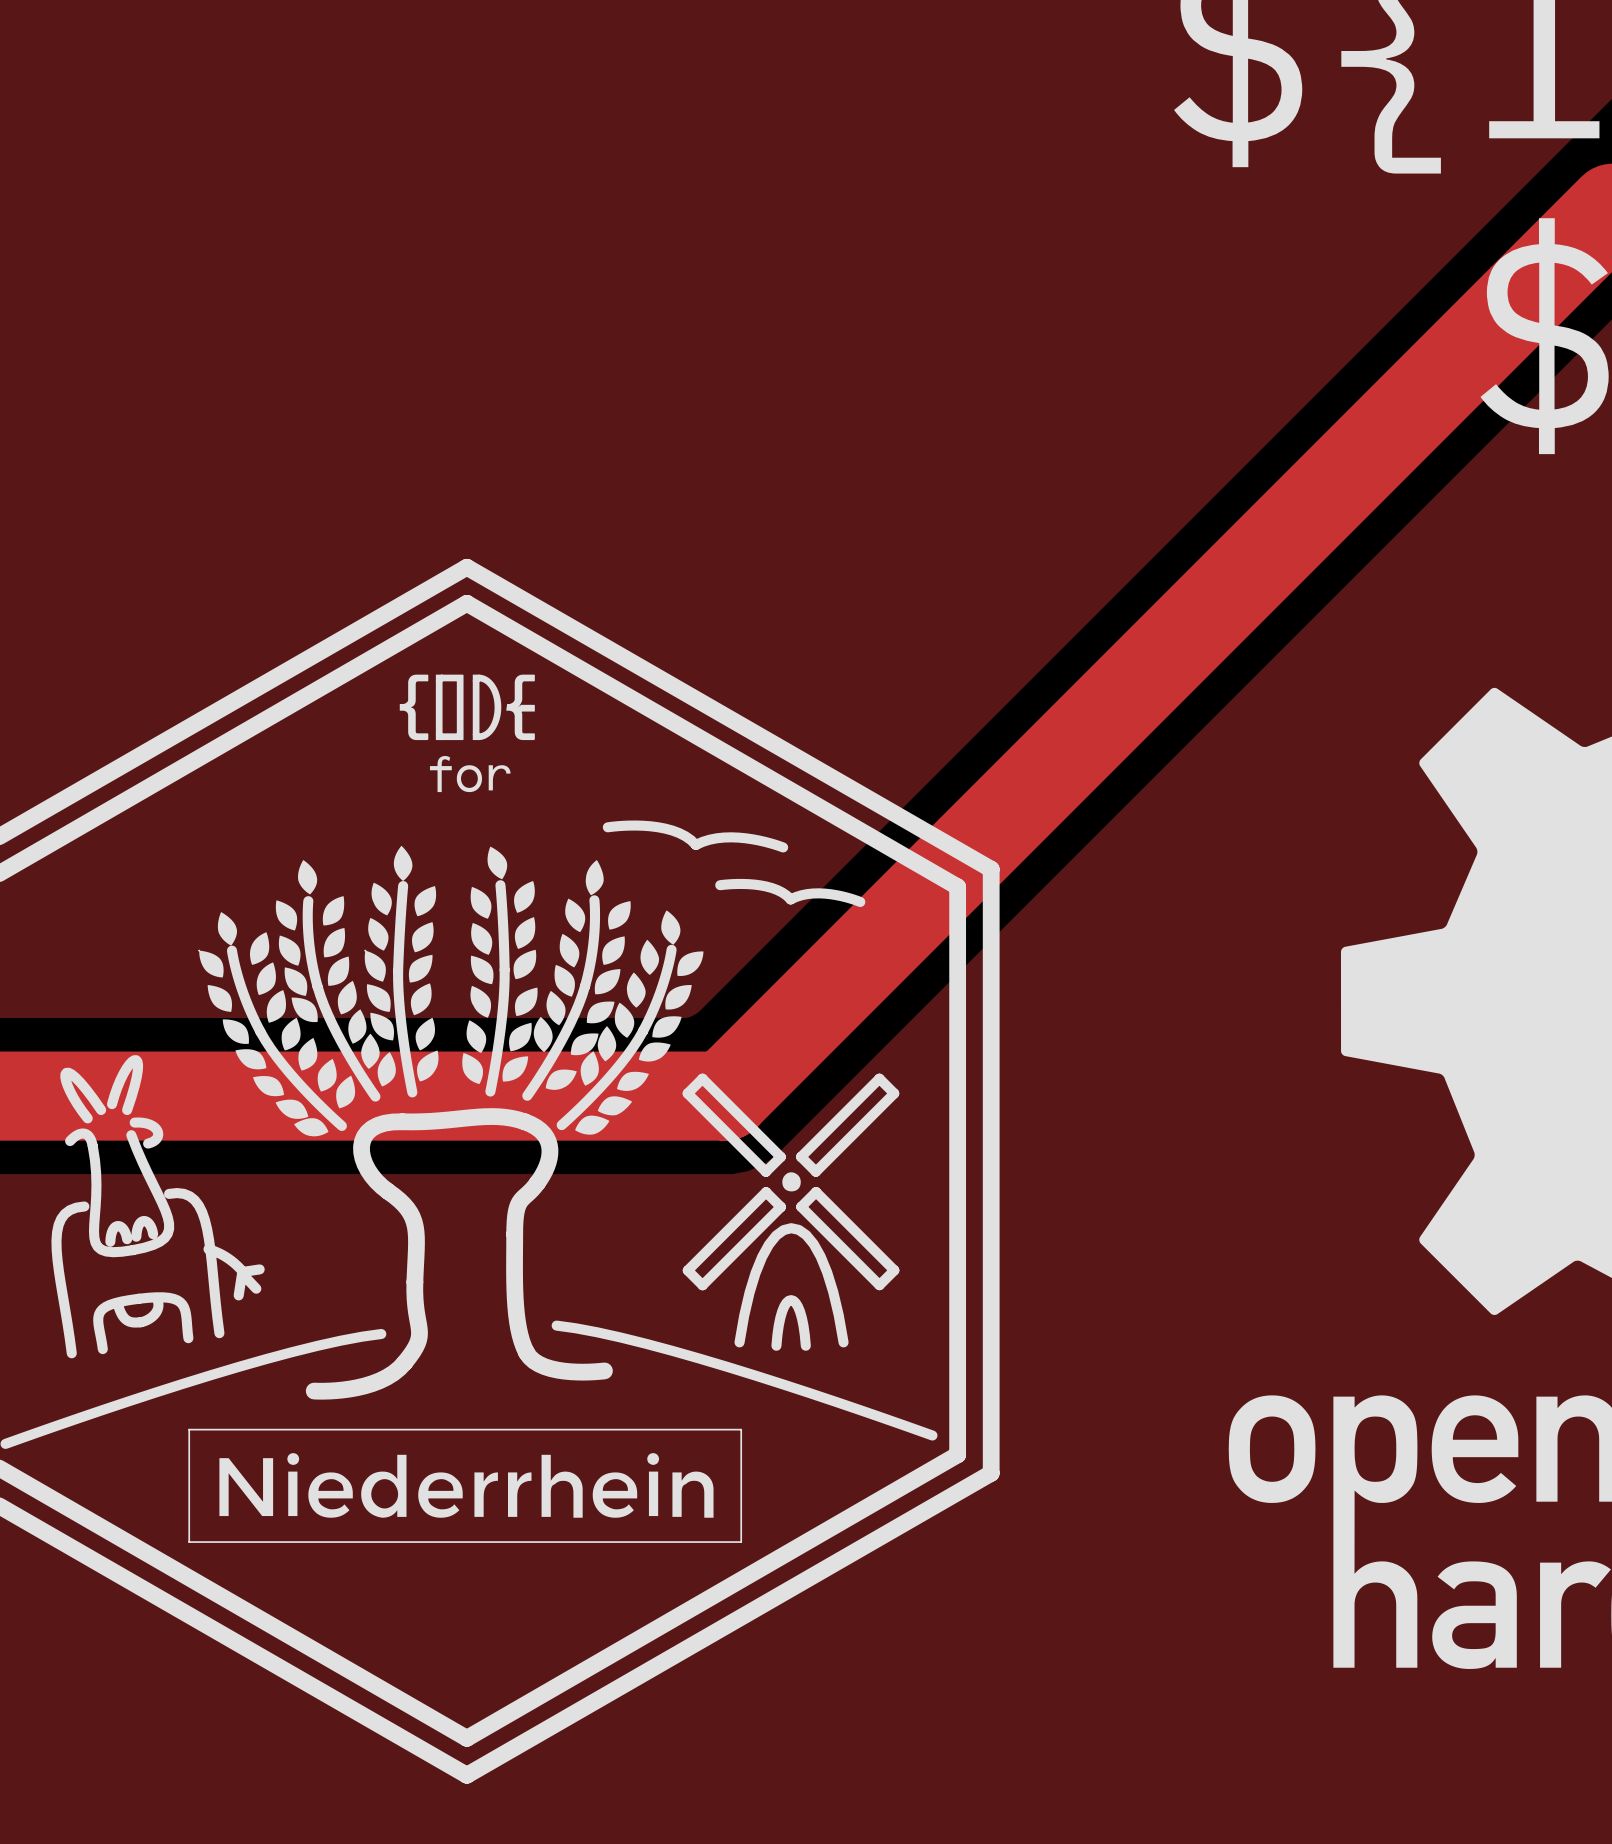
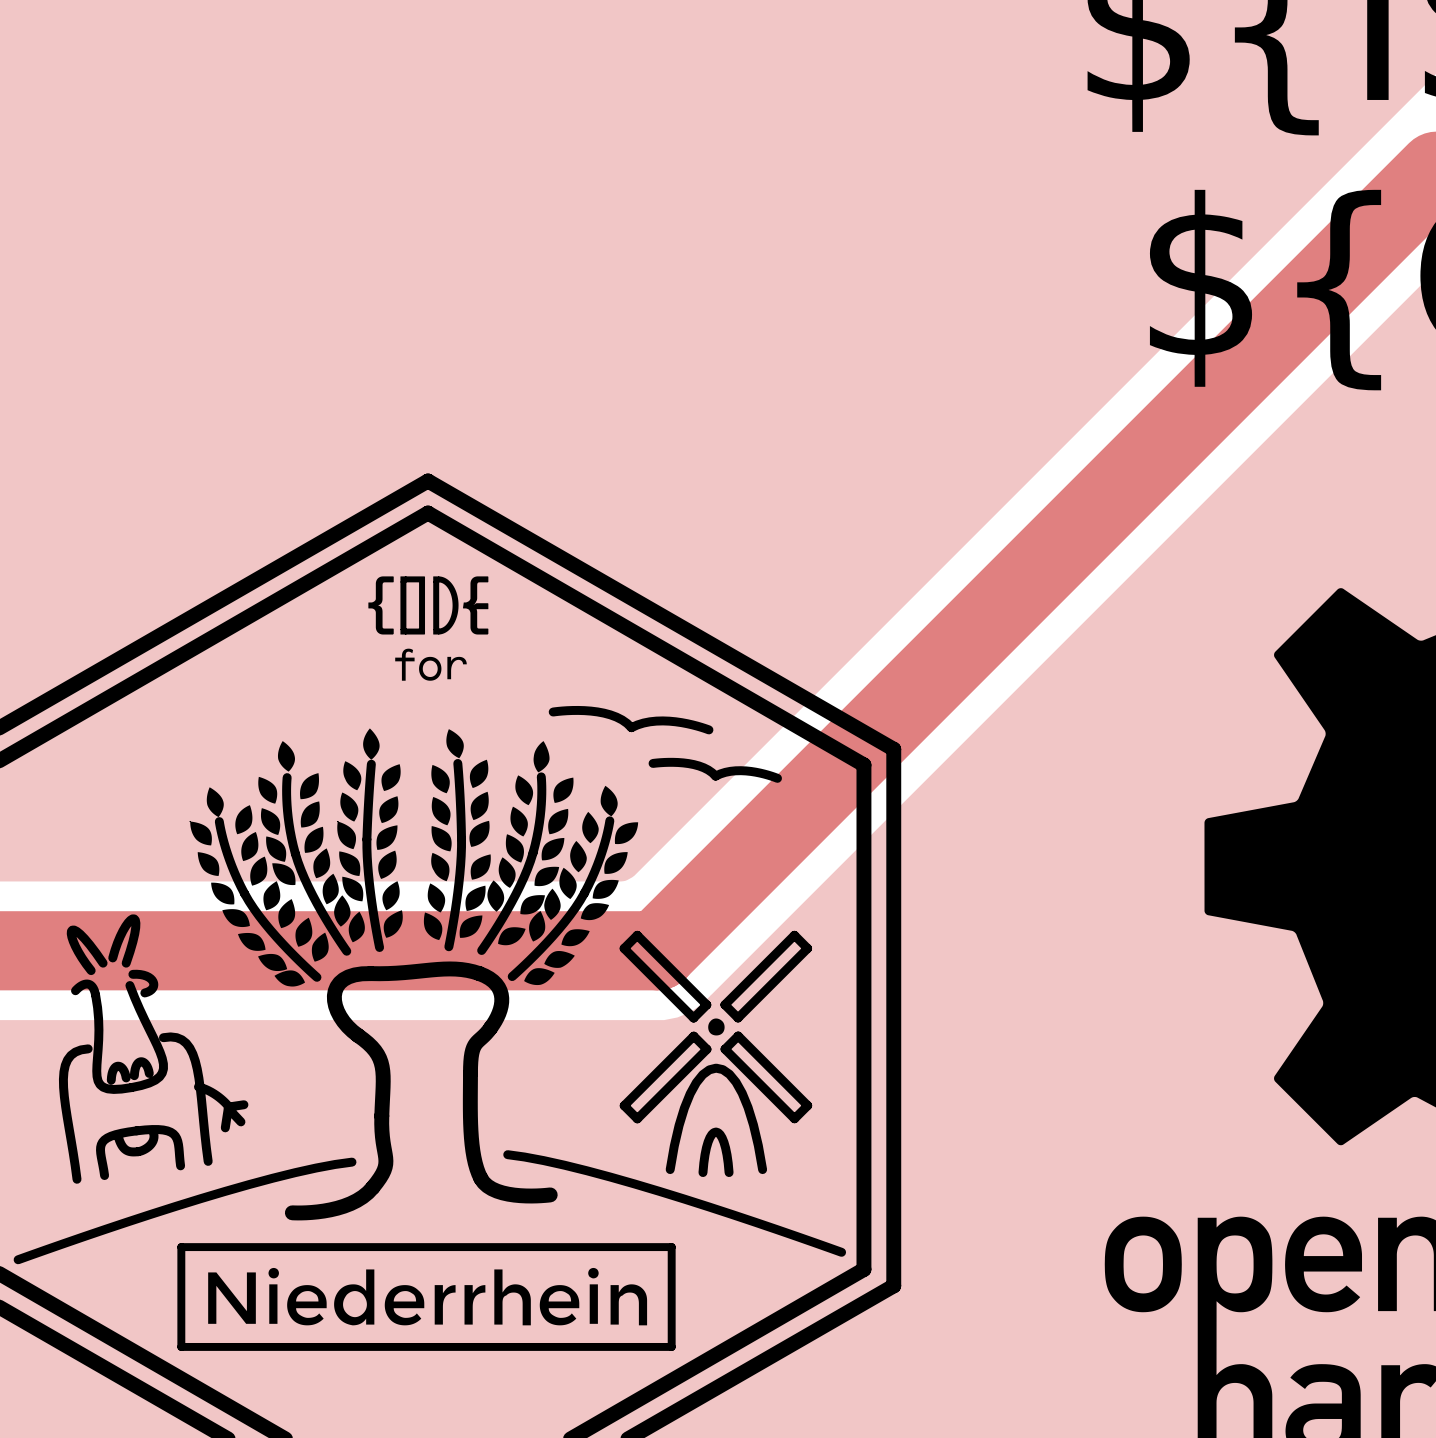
line width: thin (189, 1429) (189, 1542) (741, 1542) (741, 1429) (189, 1429) -> thick (181, 1247) (181, 1346) (671, 1346) (671, 1247) (181, 1247)

